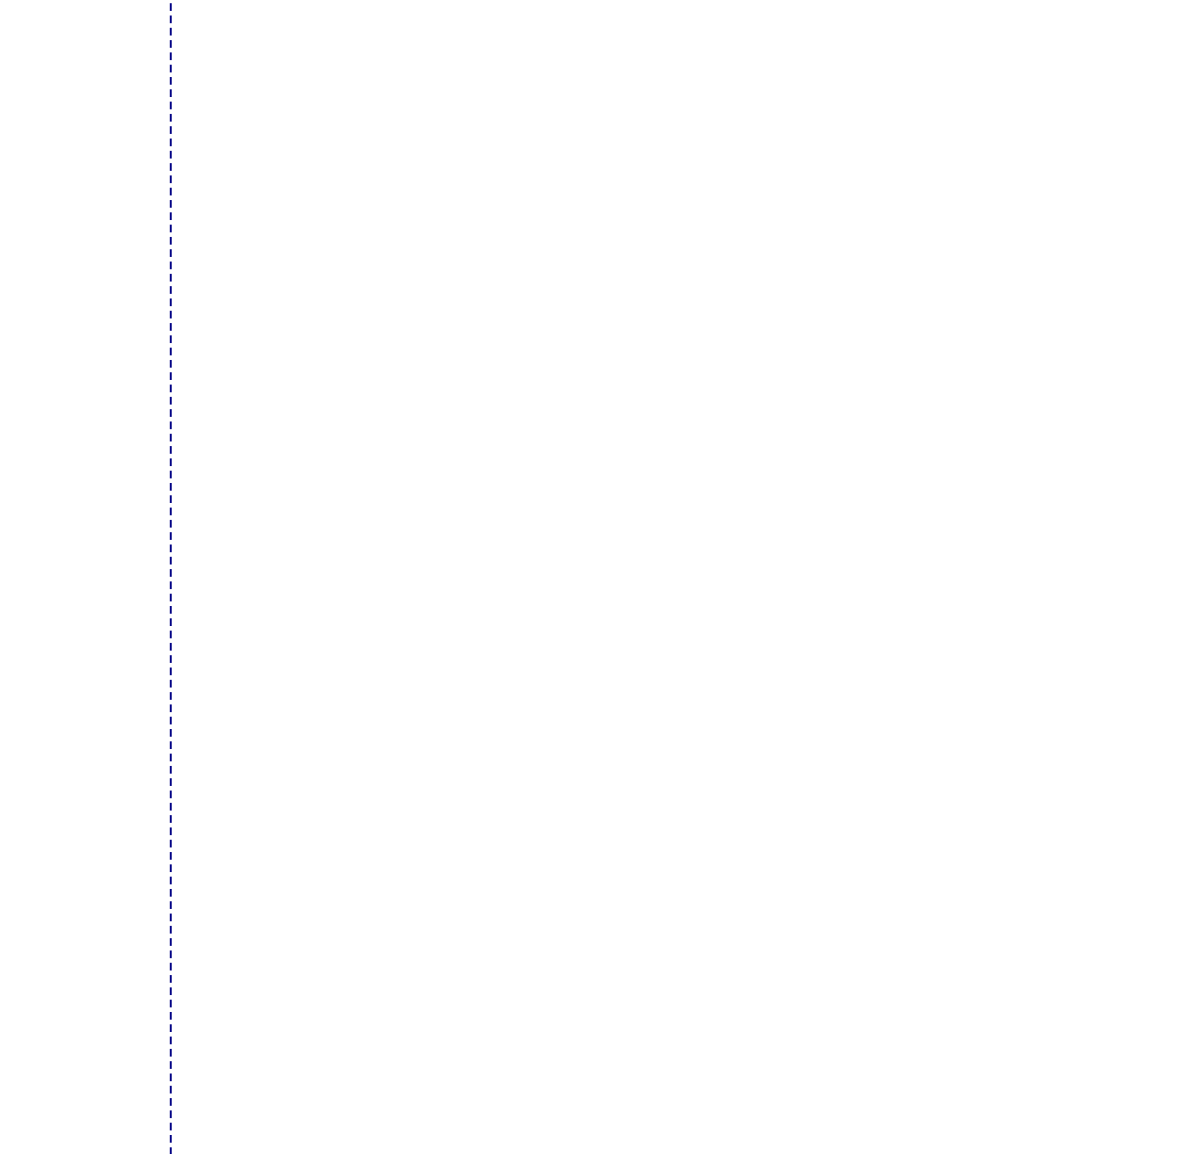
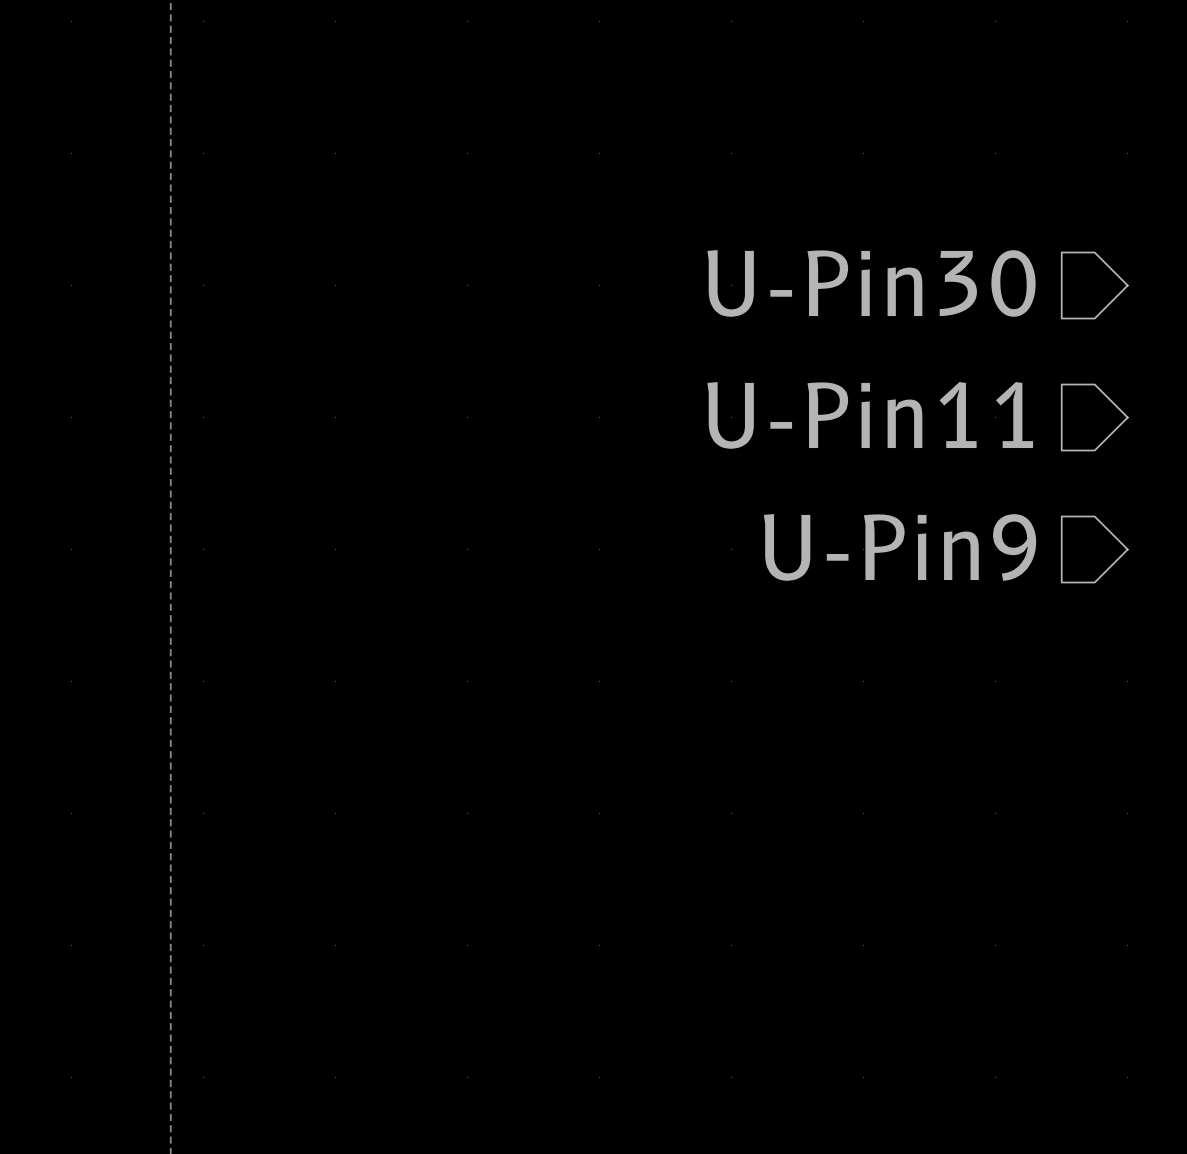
hierarchical label: none -> U-Pin30 (871, 283)
hierarchical label: none -> U-Pin11 (870, 415)
hierarchical label: none -> U-Pin9 (900, 547)

